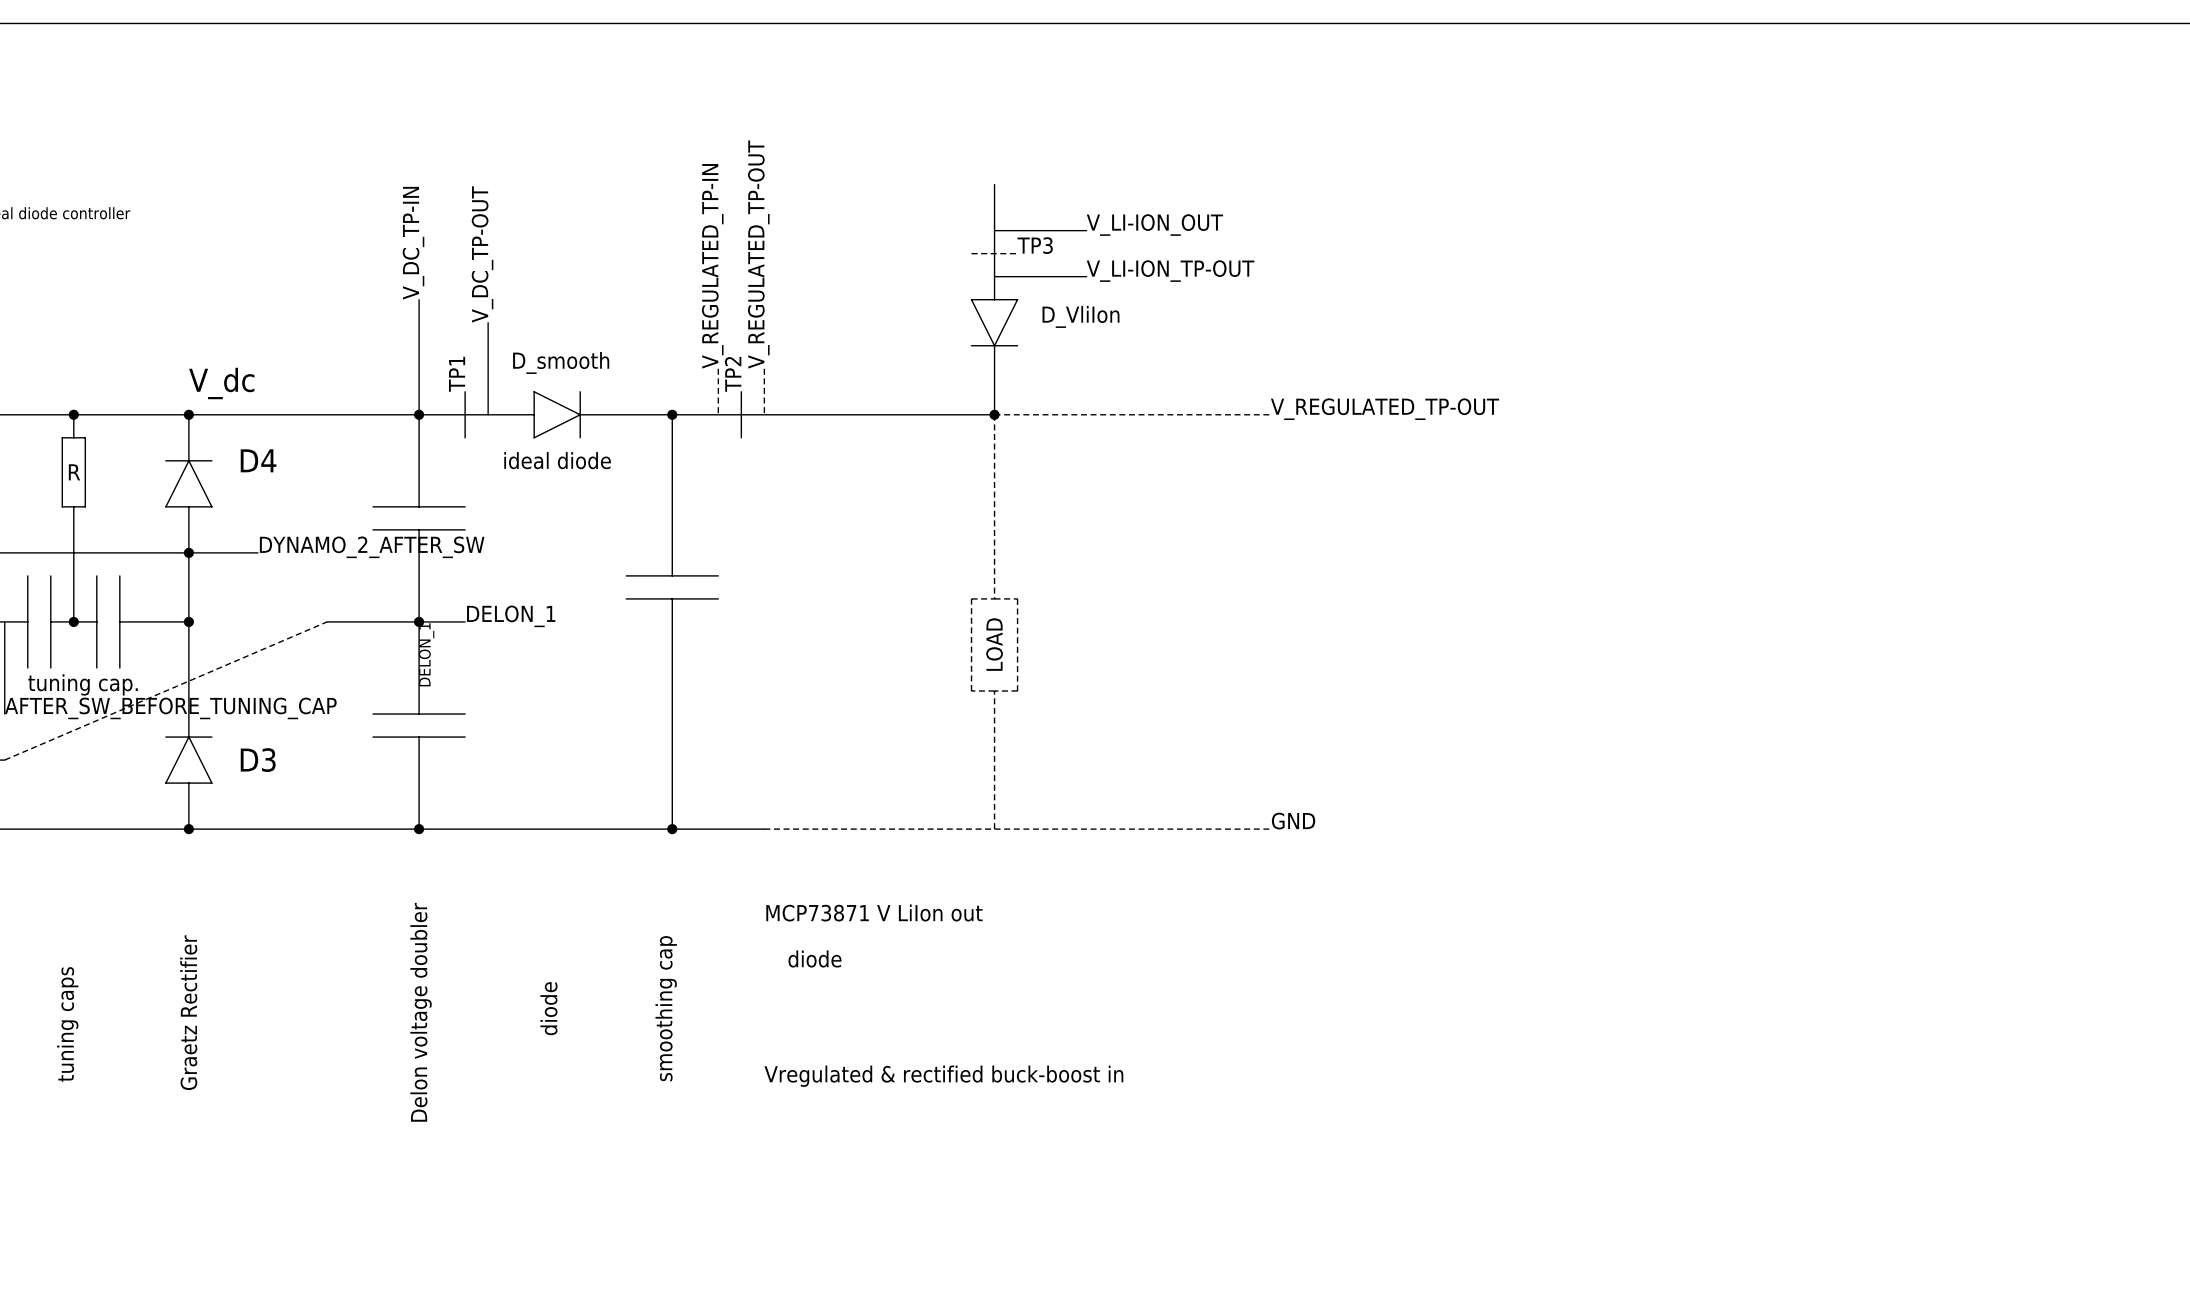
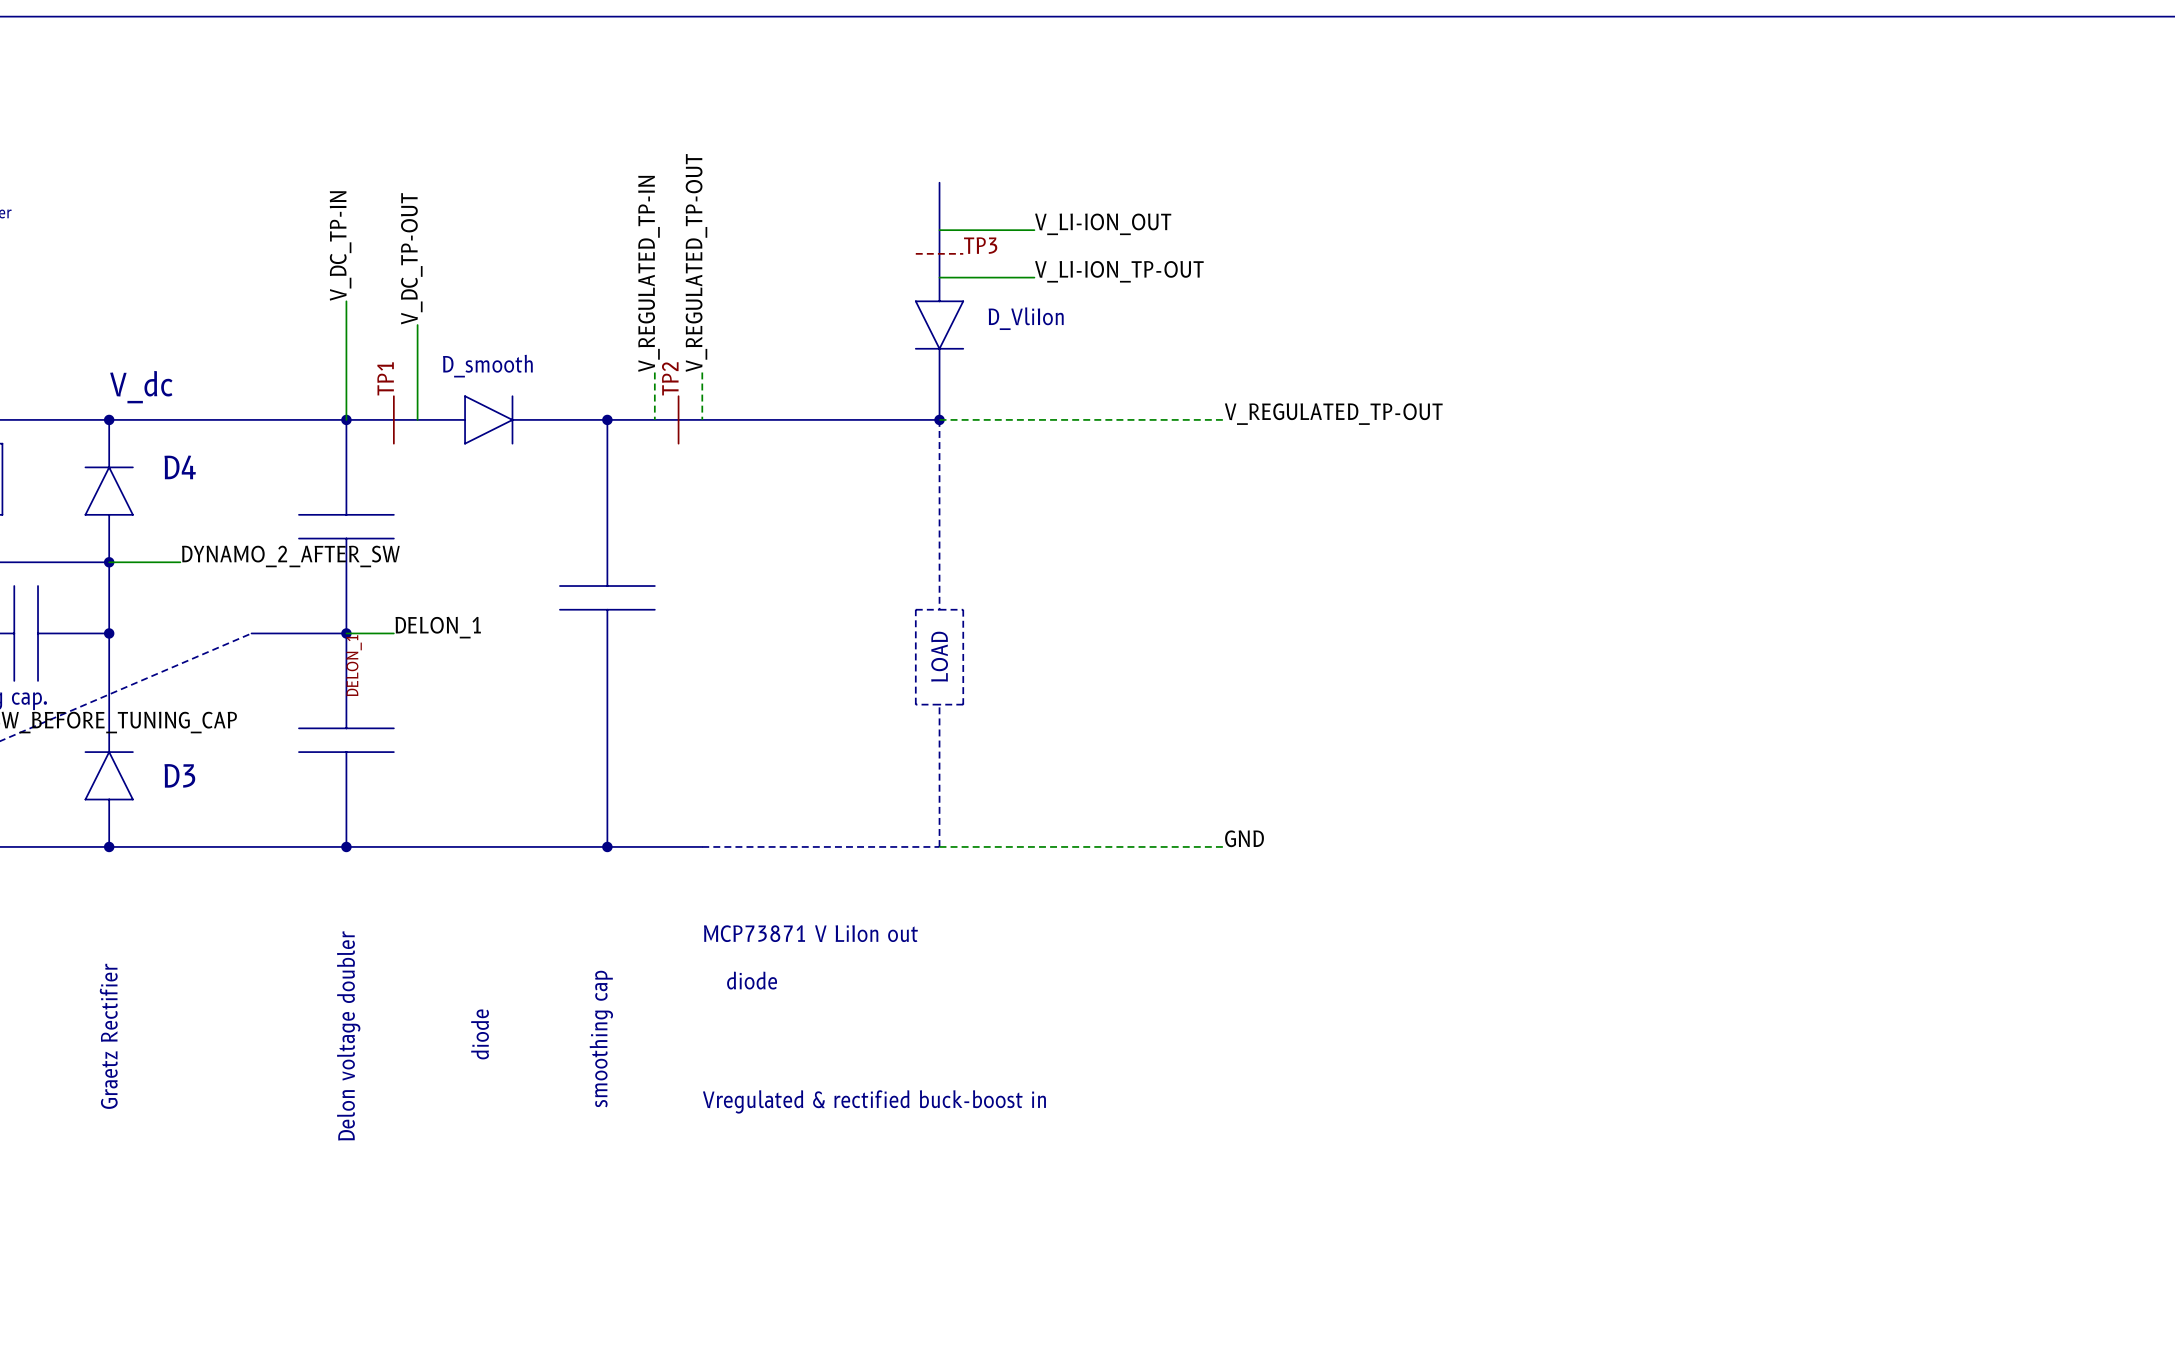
text: ideal diode (557, 460) -> none

